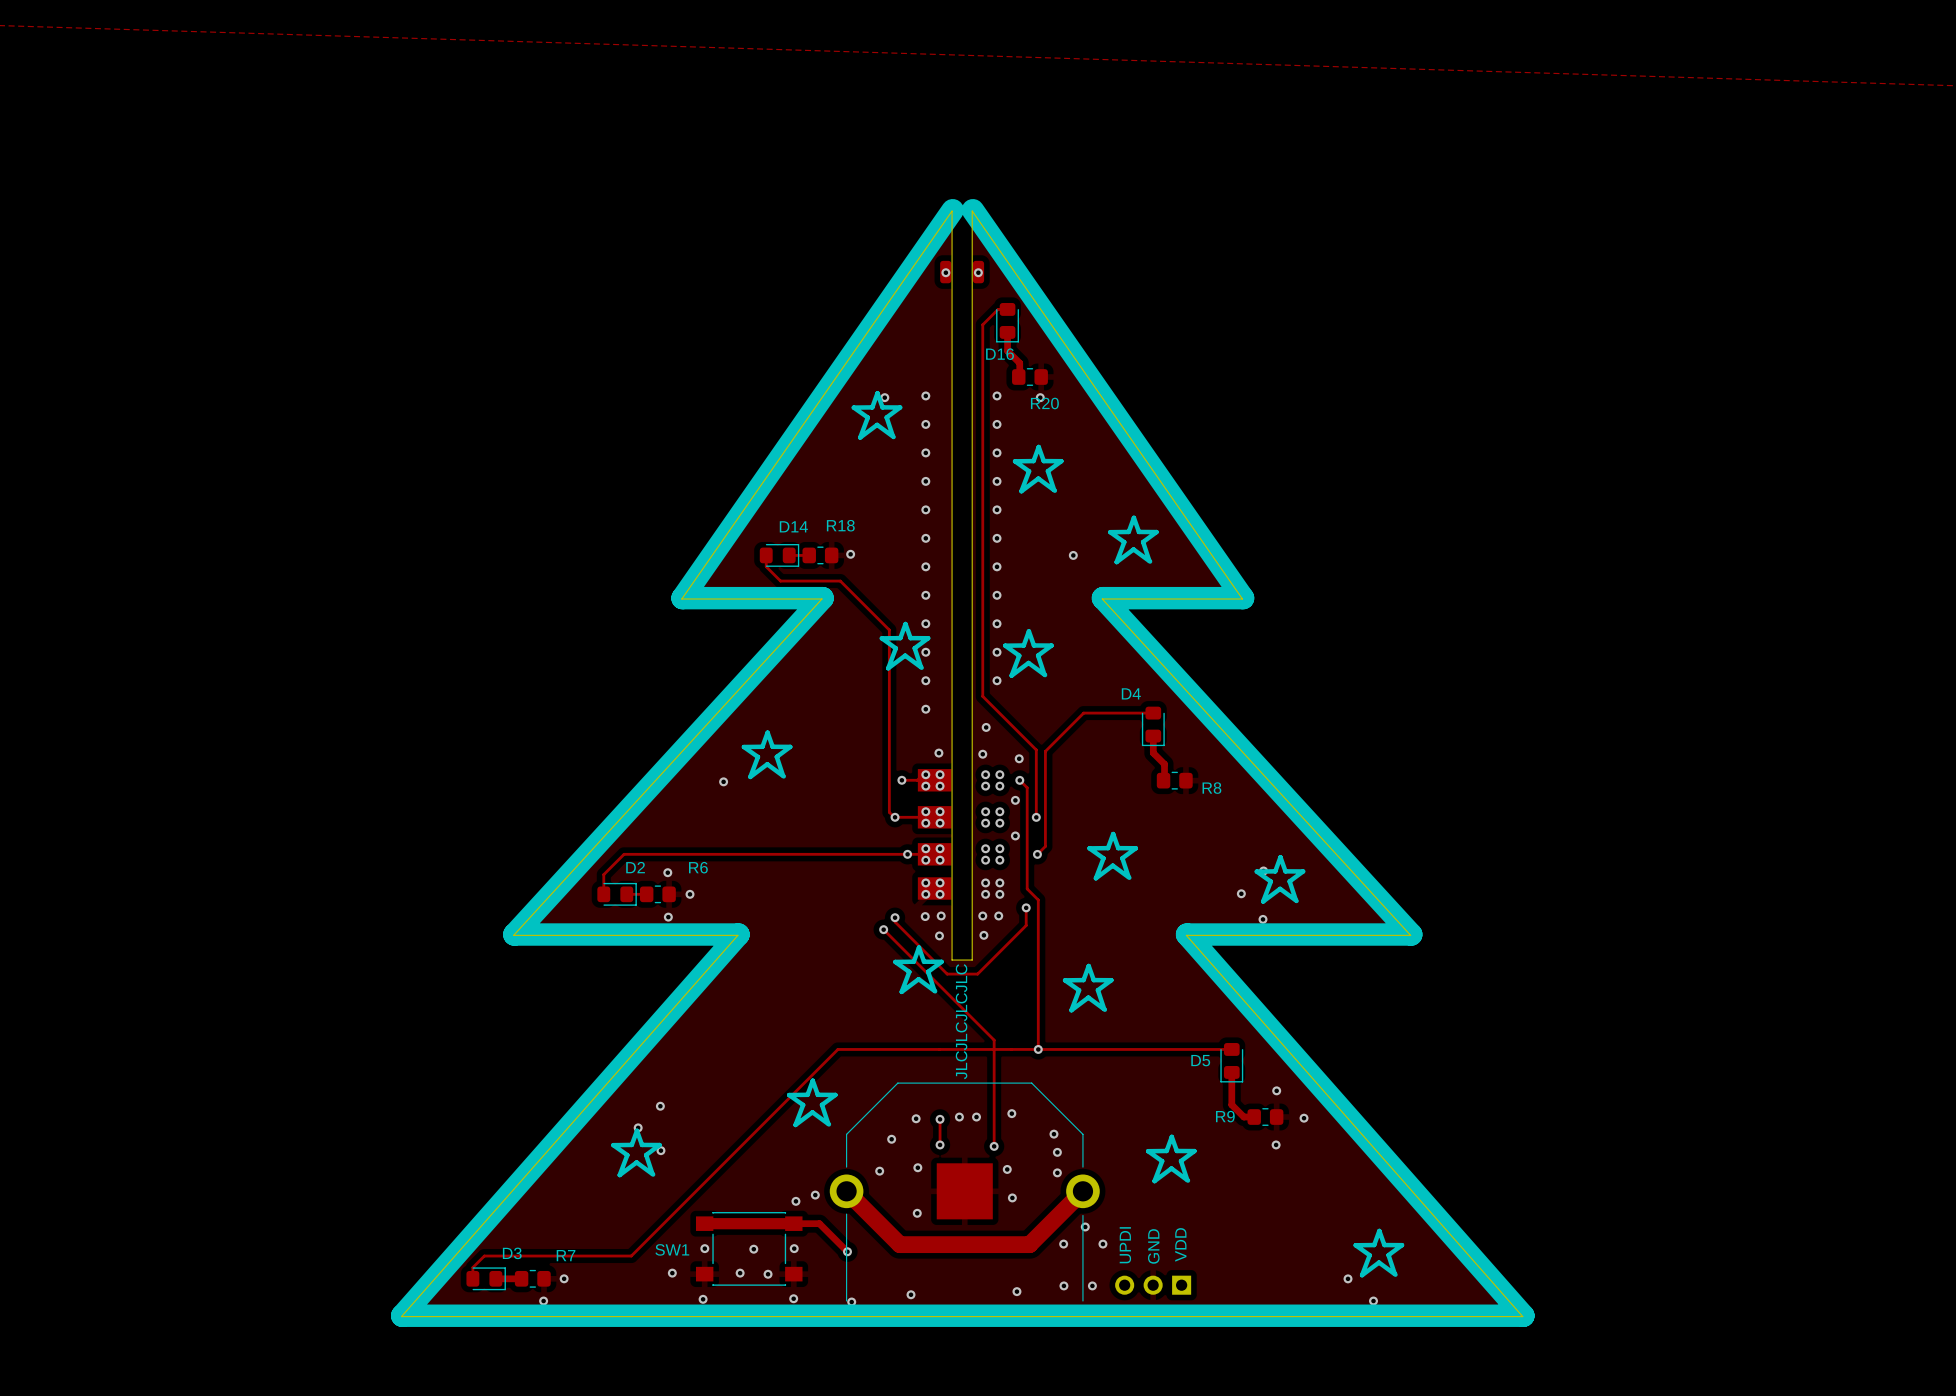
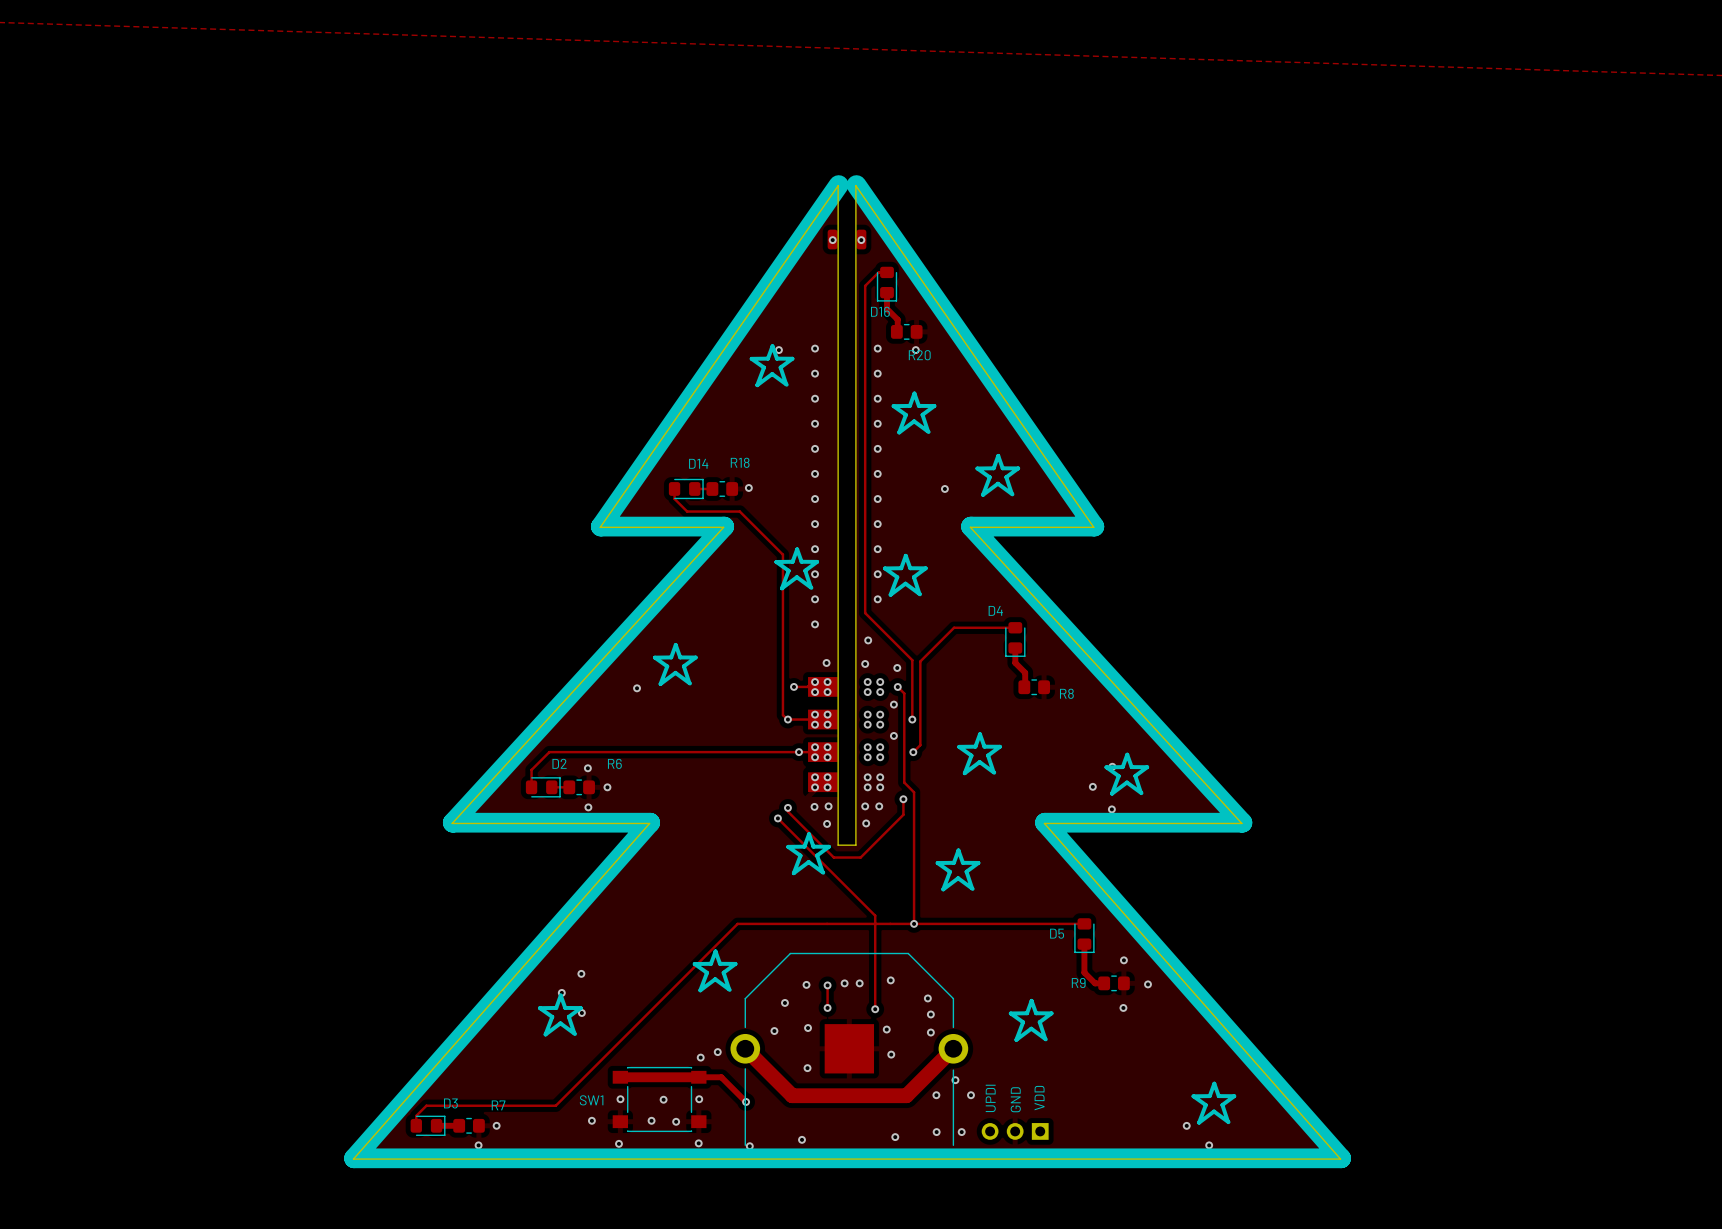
text: JLCJLCJLCJLC (961, 1021) -> none

